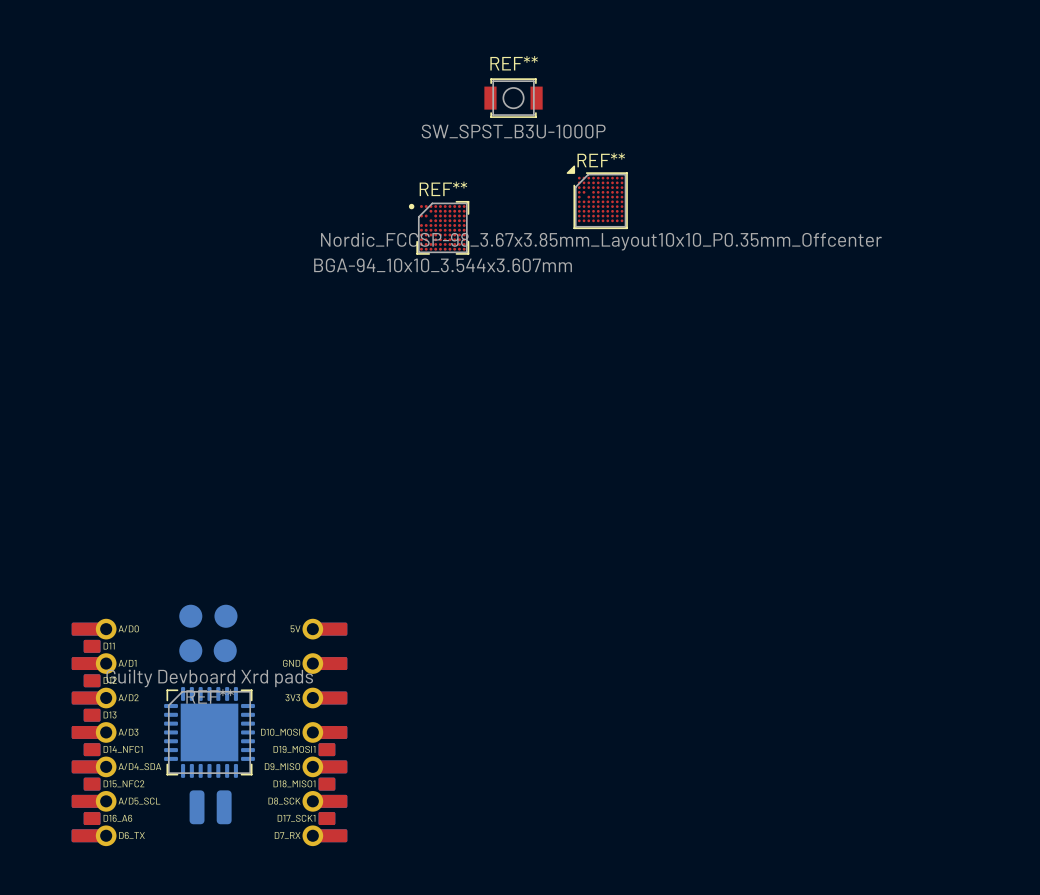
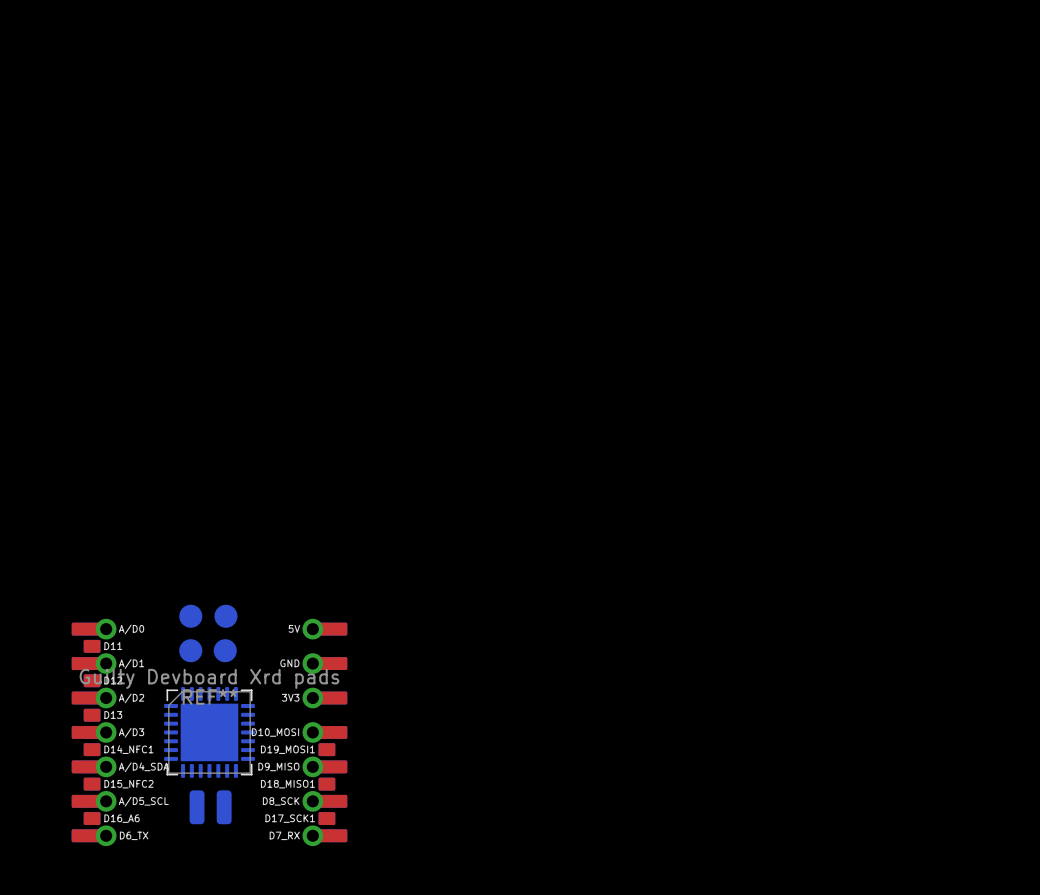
REF**: SW_SPST_B3U-1000P (513, 98) -> none
REF**: Nordic_FCCSP-98_3.67x3.85mm_Layout10x10_P0.35mm_Offcenter (597, 197) -> none
REF**: BGA-94_10x10_3.544x3.607mm (439, 227) -> none

